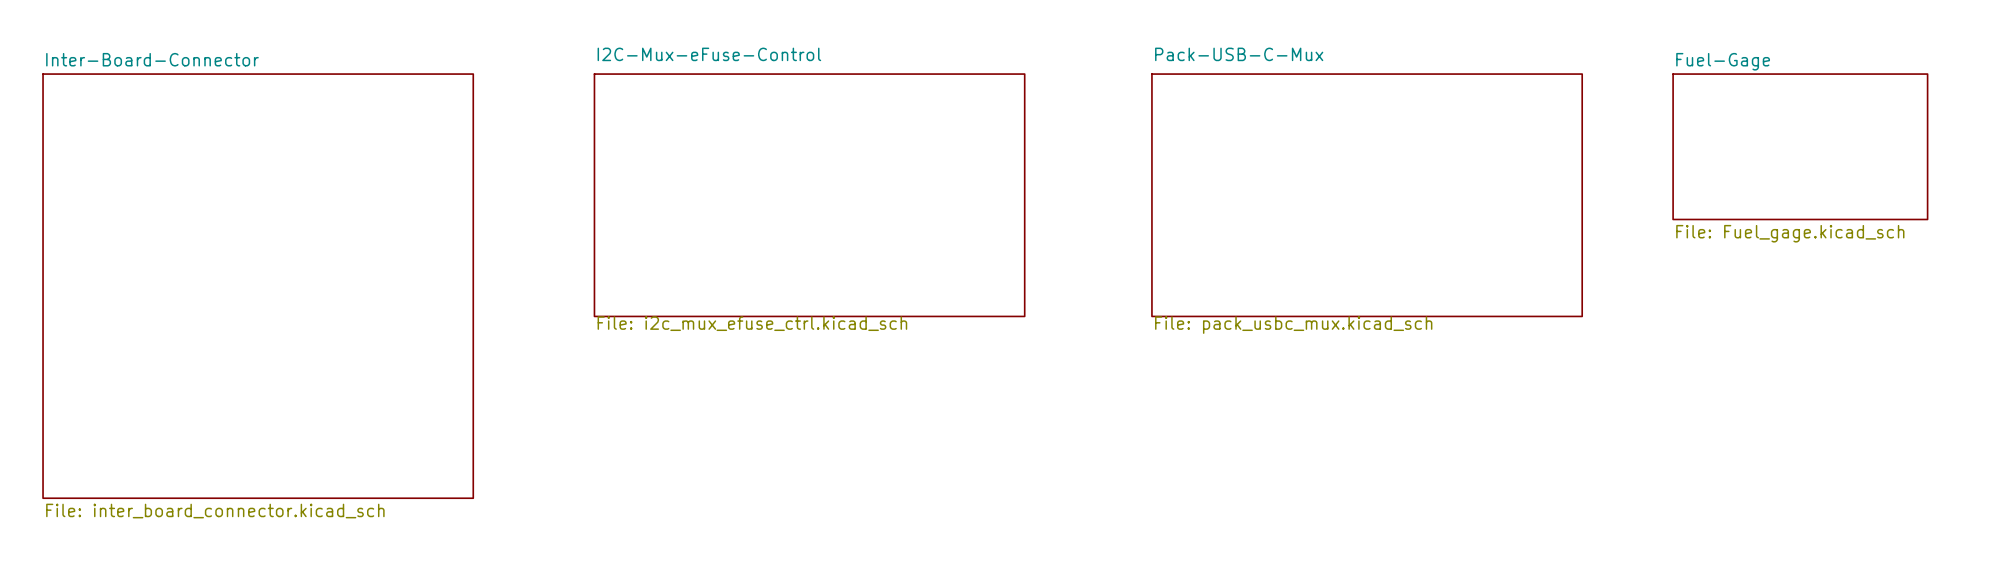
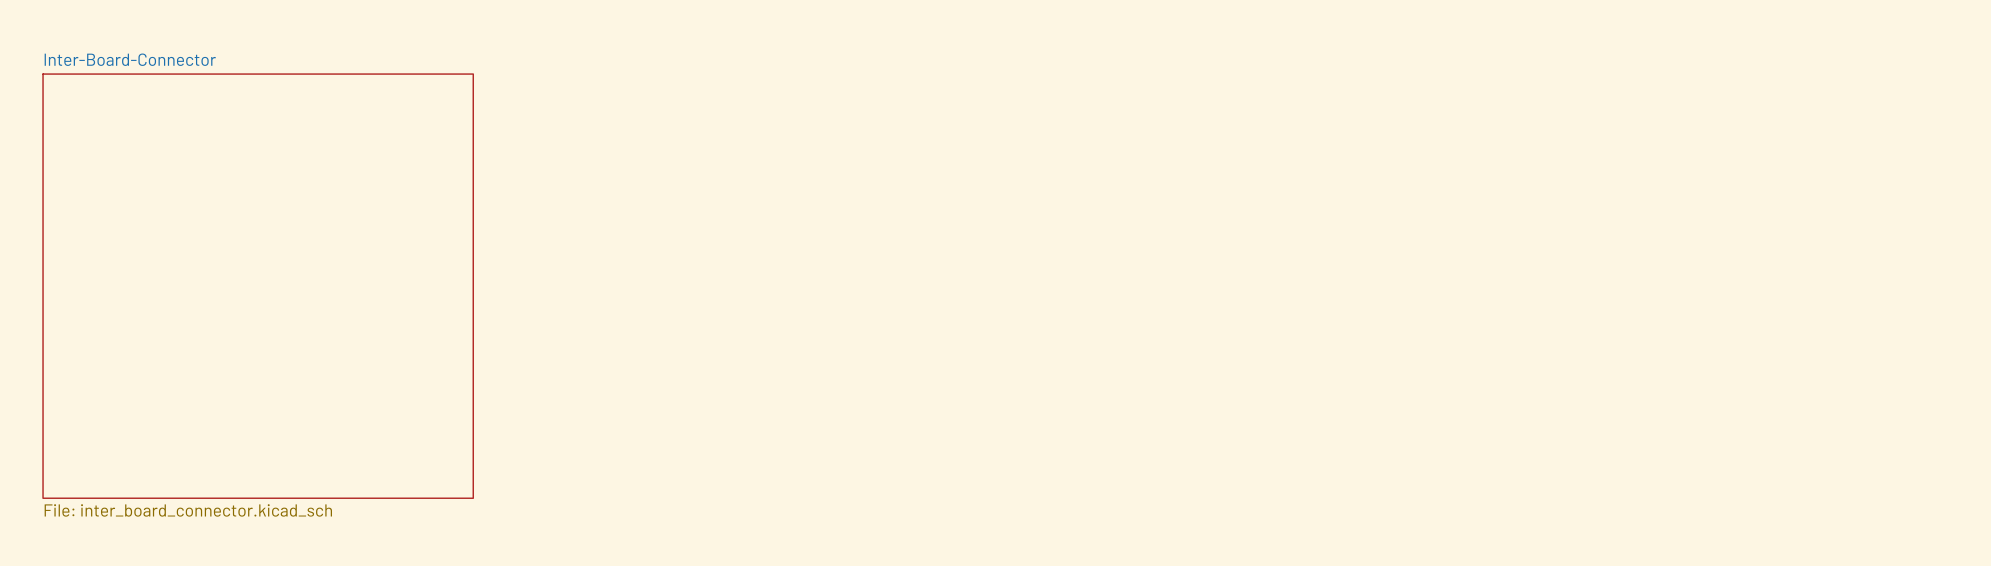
sheet Fuel-Gage: File: Fuel_gage.kicad_sch (1800, 146) -> none
sheet I2C-Mux-eFuse-Control: File: i2c_mux_efuse_ctrl.kicad_sch (809, 195) -> none
sheet Pack-USB-C-Mux: File: pack_usbc_mux.kicad_sch (1367, 195) -> none

